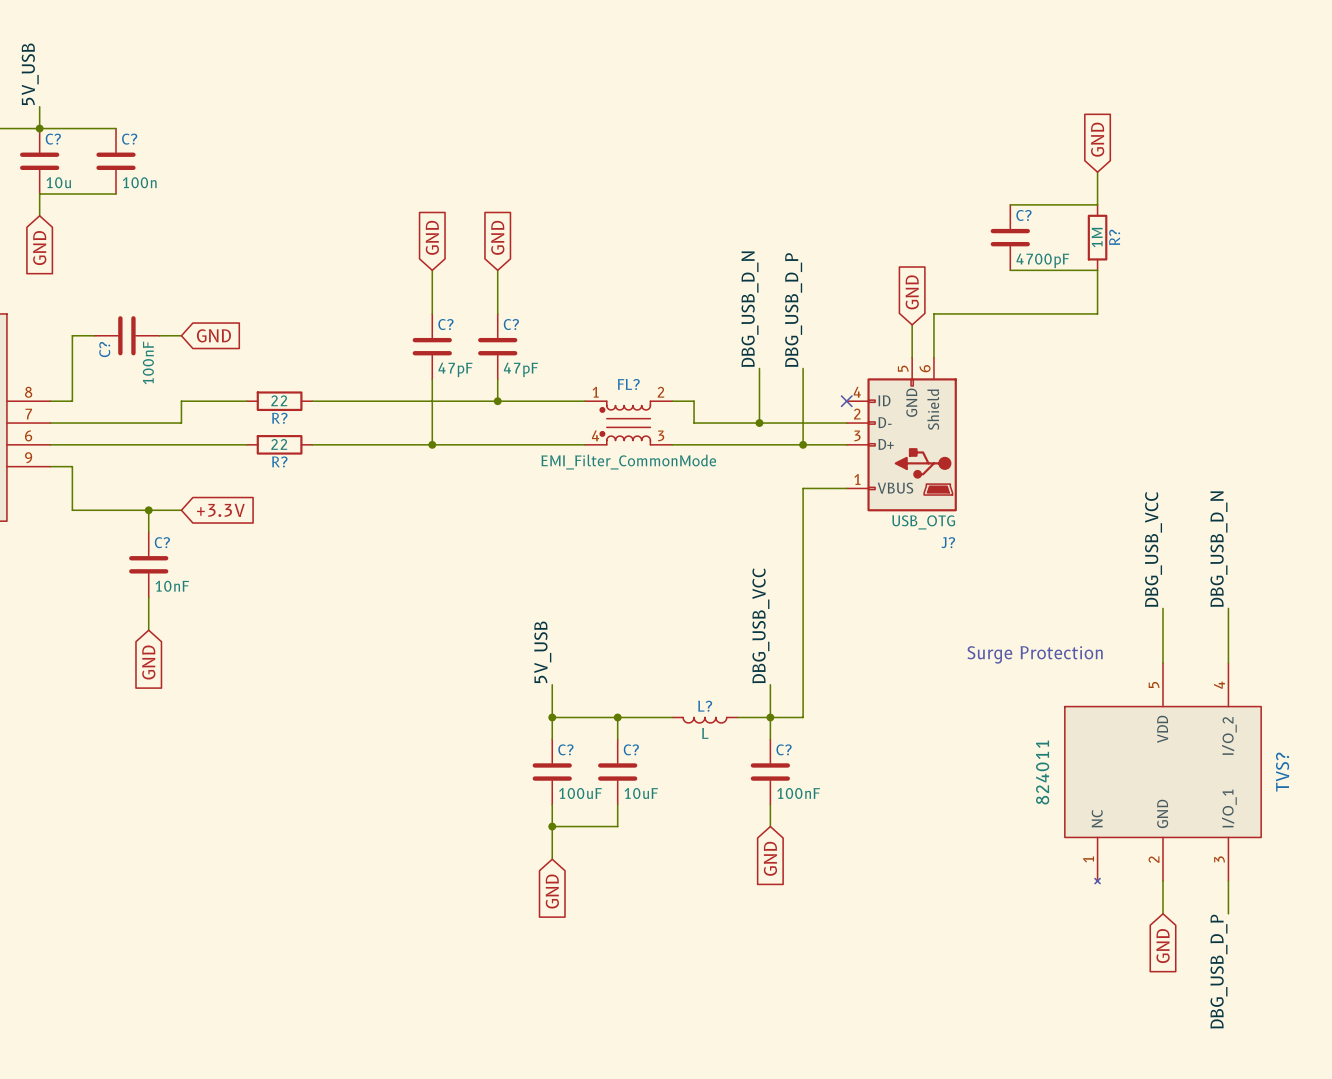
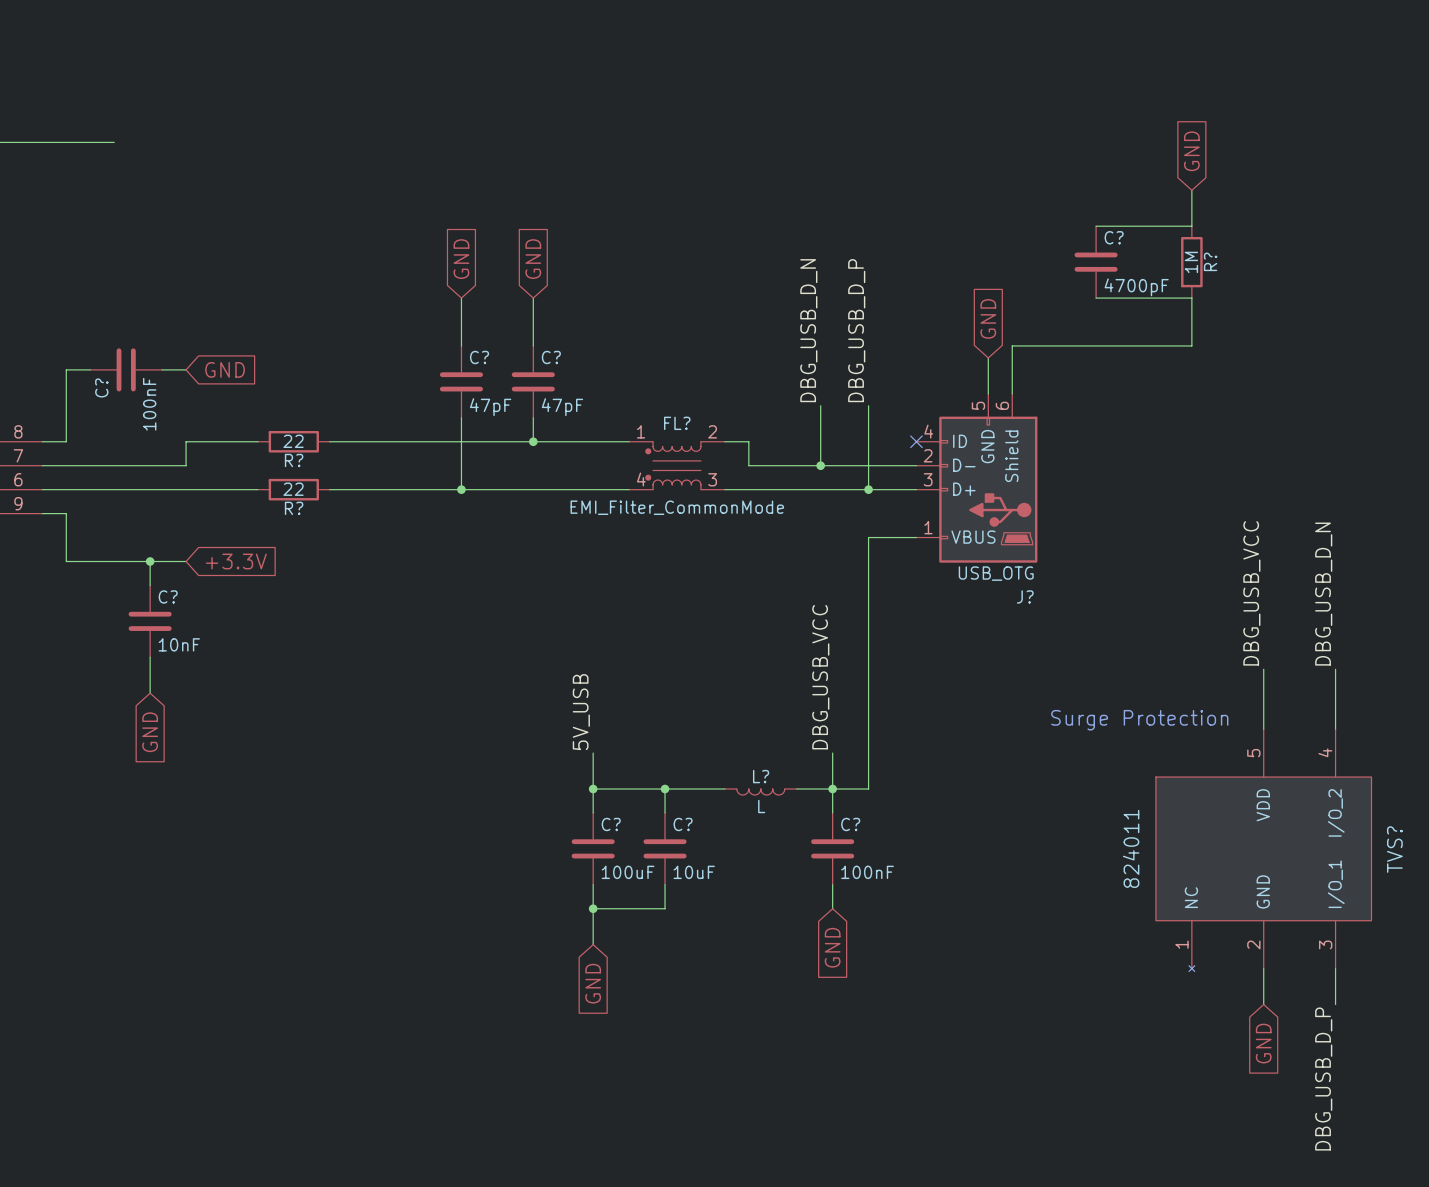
label: 5V_USB (30, 74) -> none
wire: (39, 106) (39, 128) -> none
junction: (39, 128) -> none
C?: 10u (39, 161) -> none
C?: 100n (116, 161) -> none
wire: (116, 193) (39, 193) (39, 215) -> none
global label: GND (39, 248) -> none

